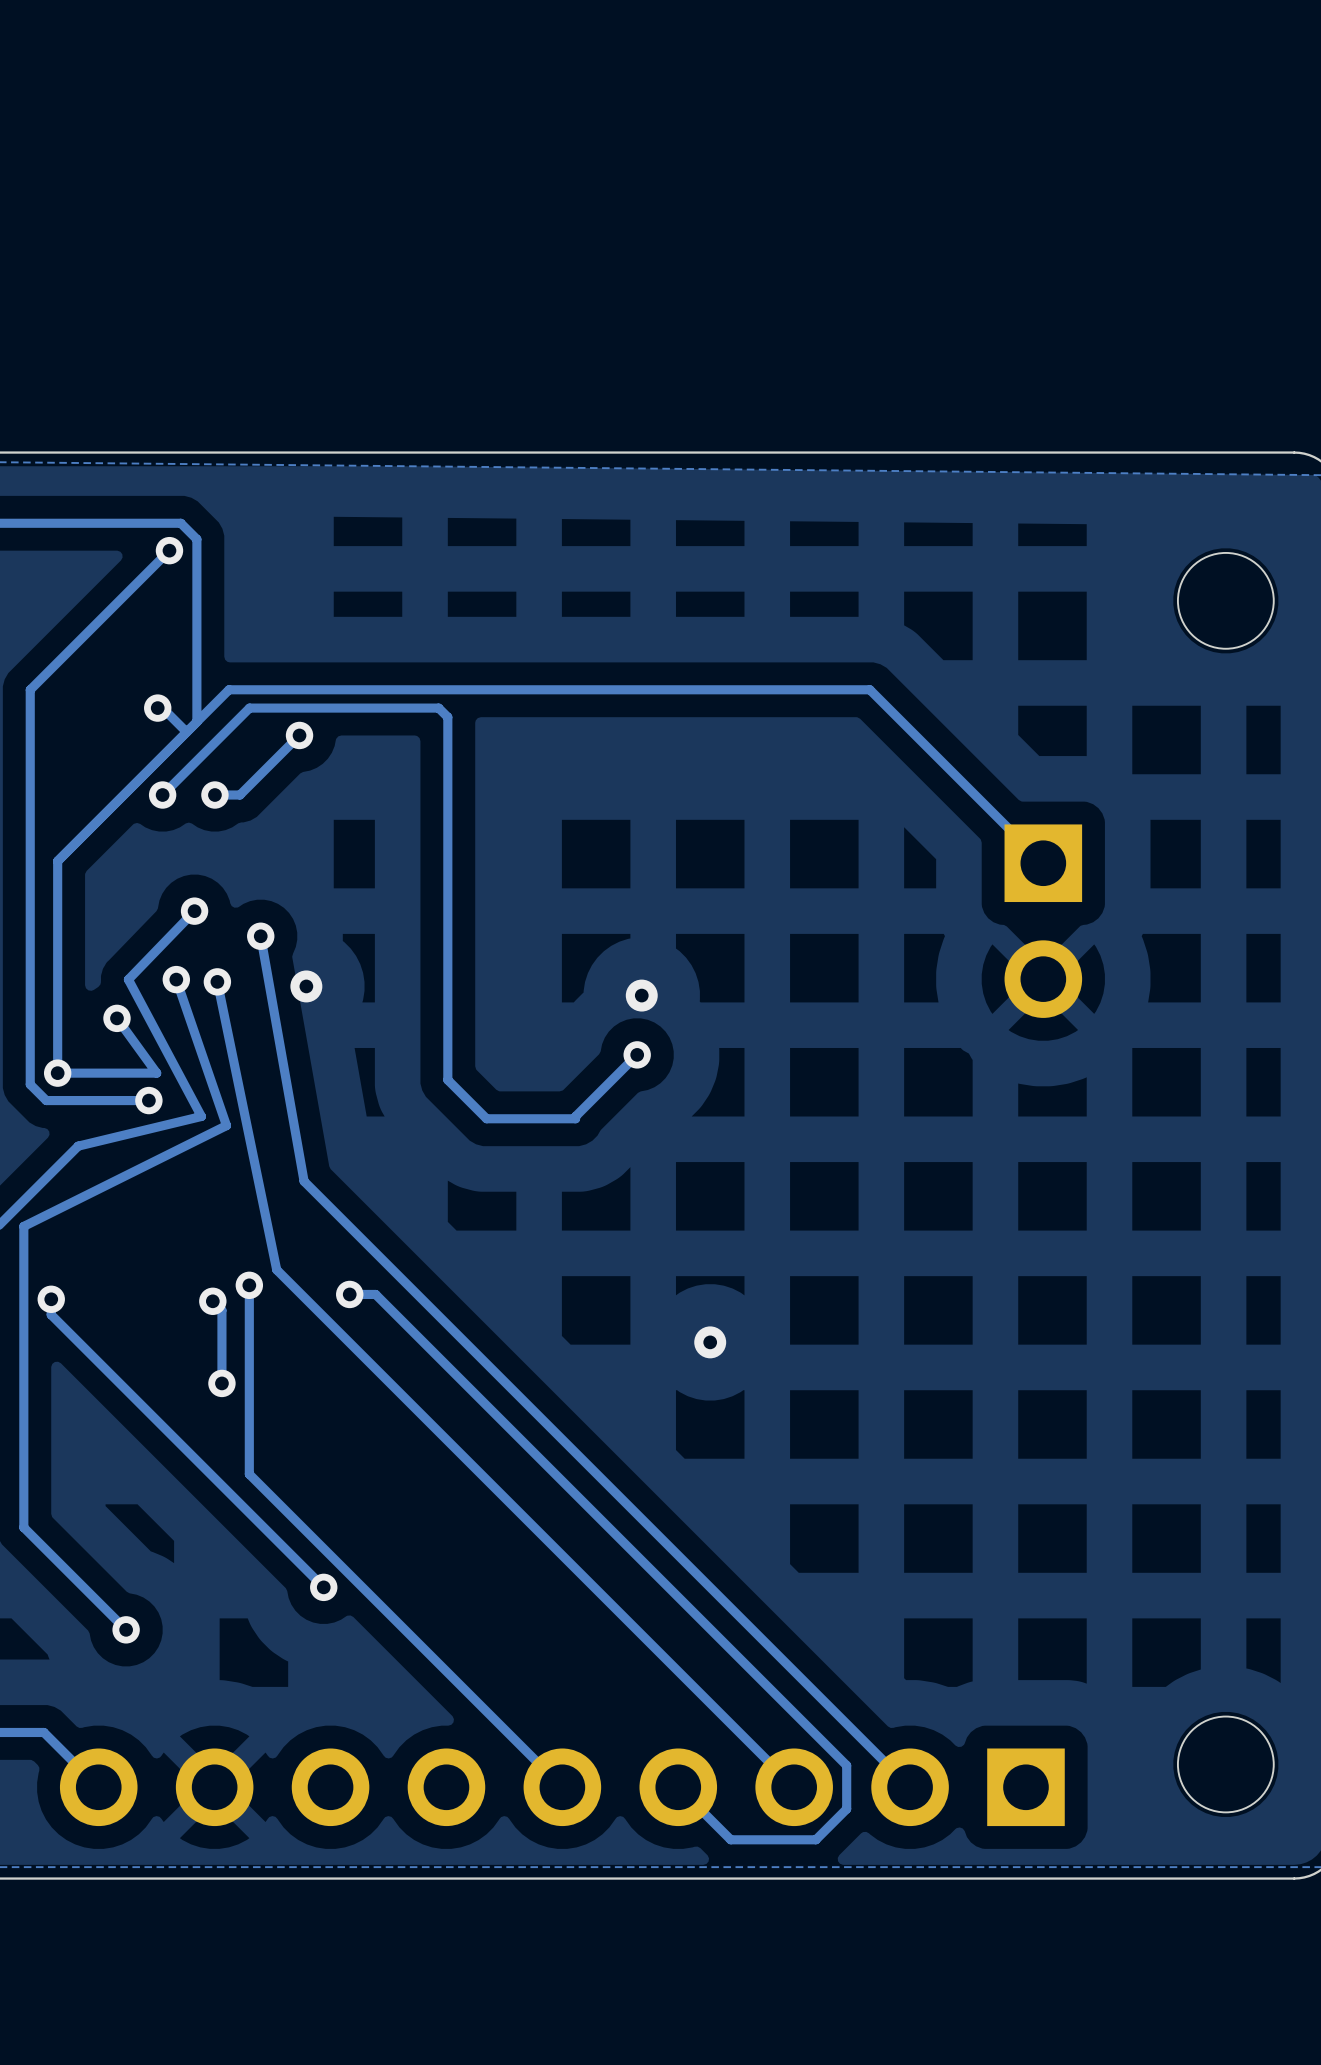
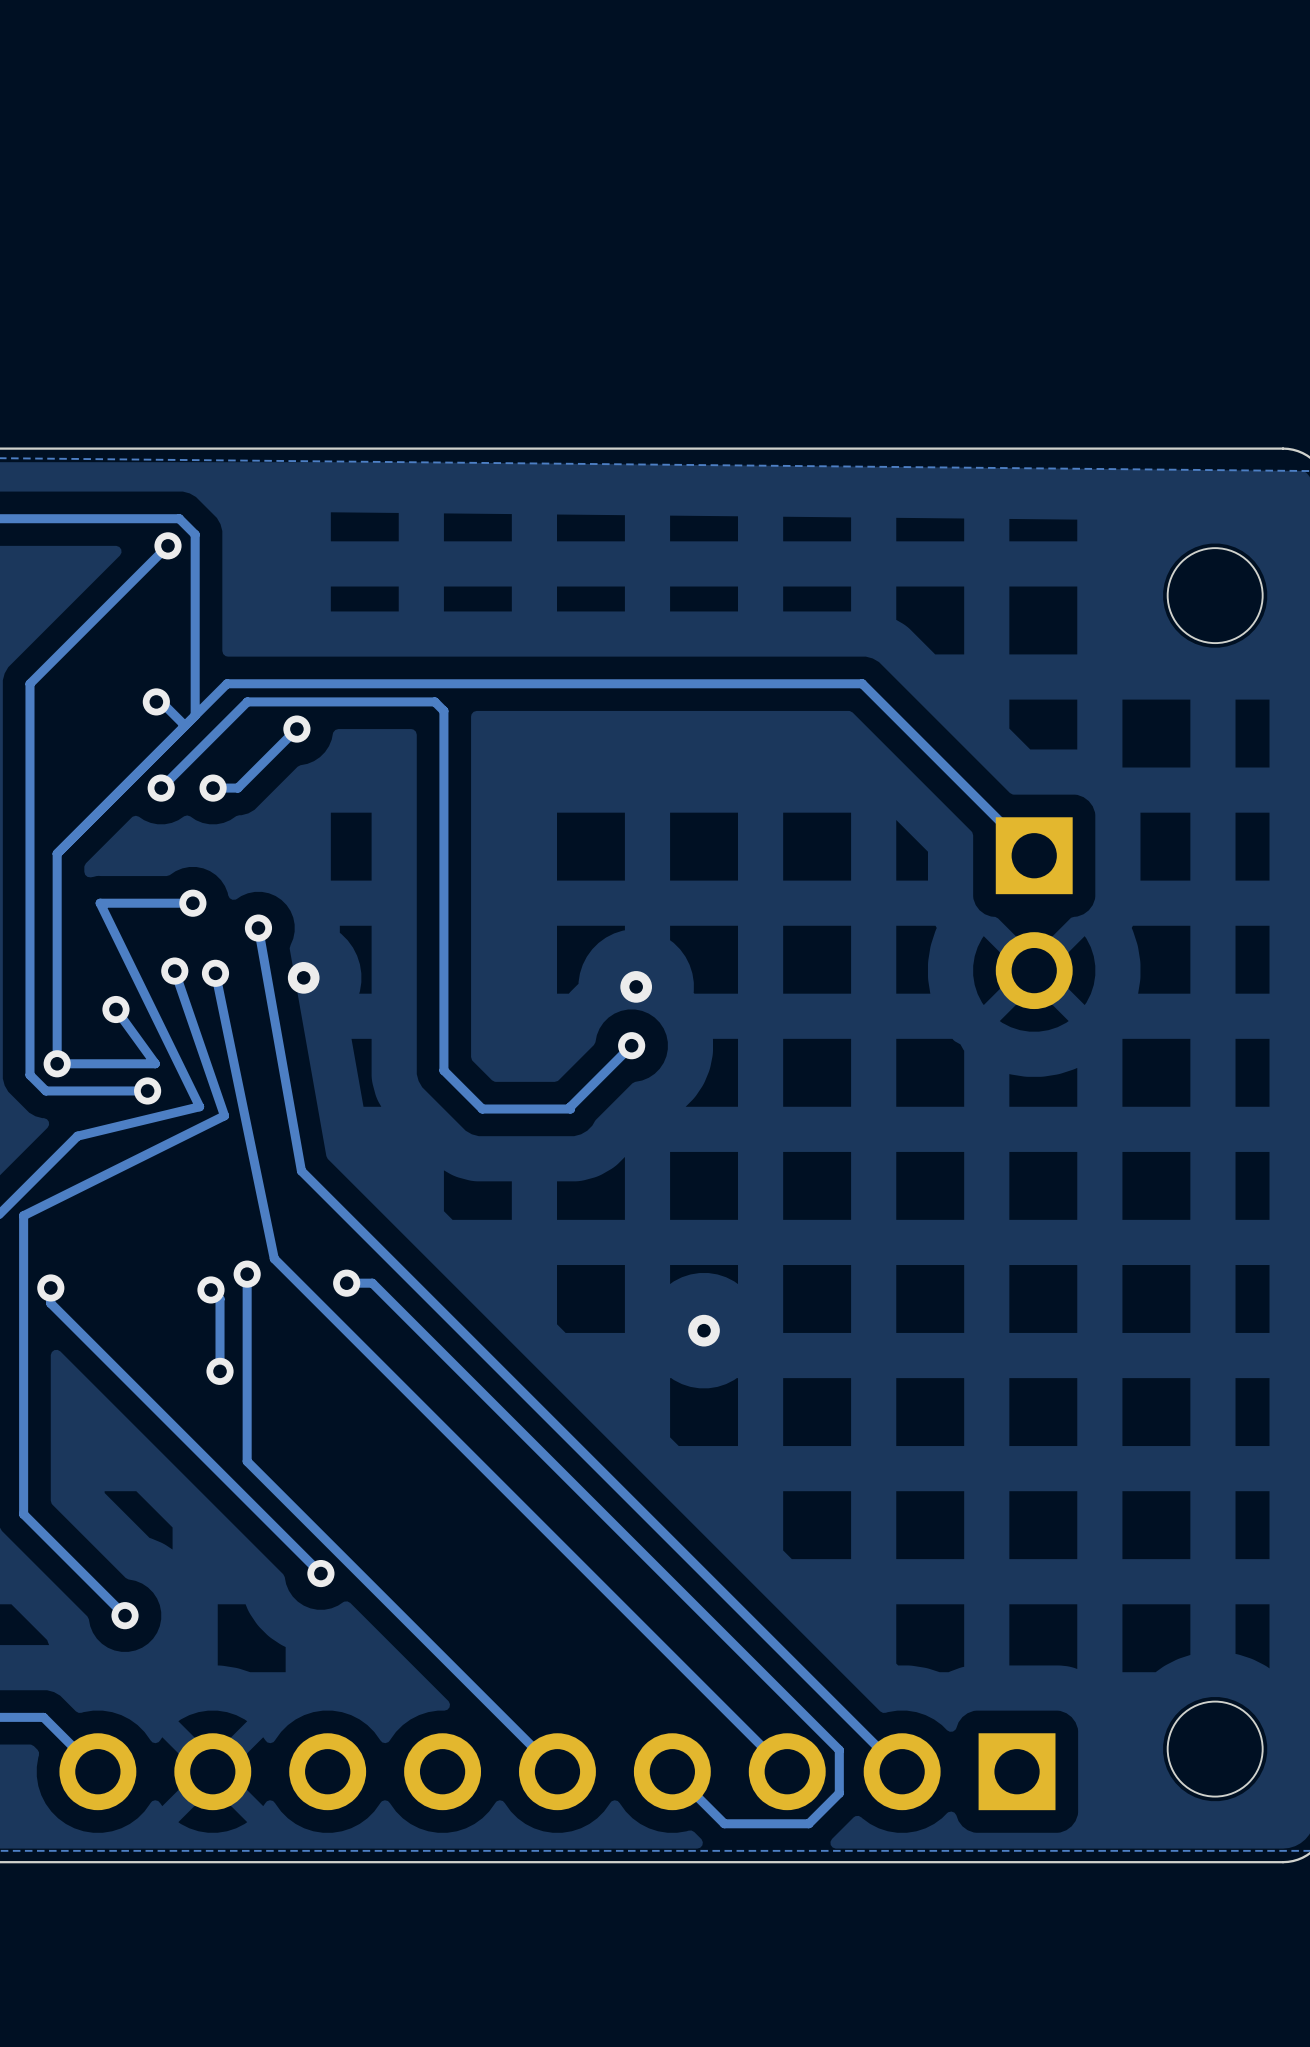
track: (194, 911) (128, 979) (201, 1116) -> (192, 903) (100, 903) (199, 1106)

